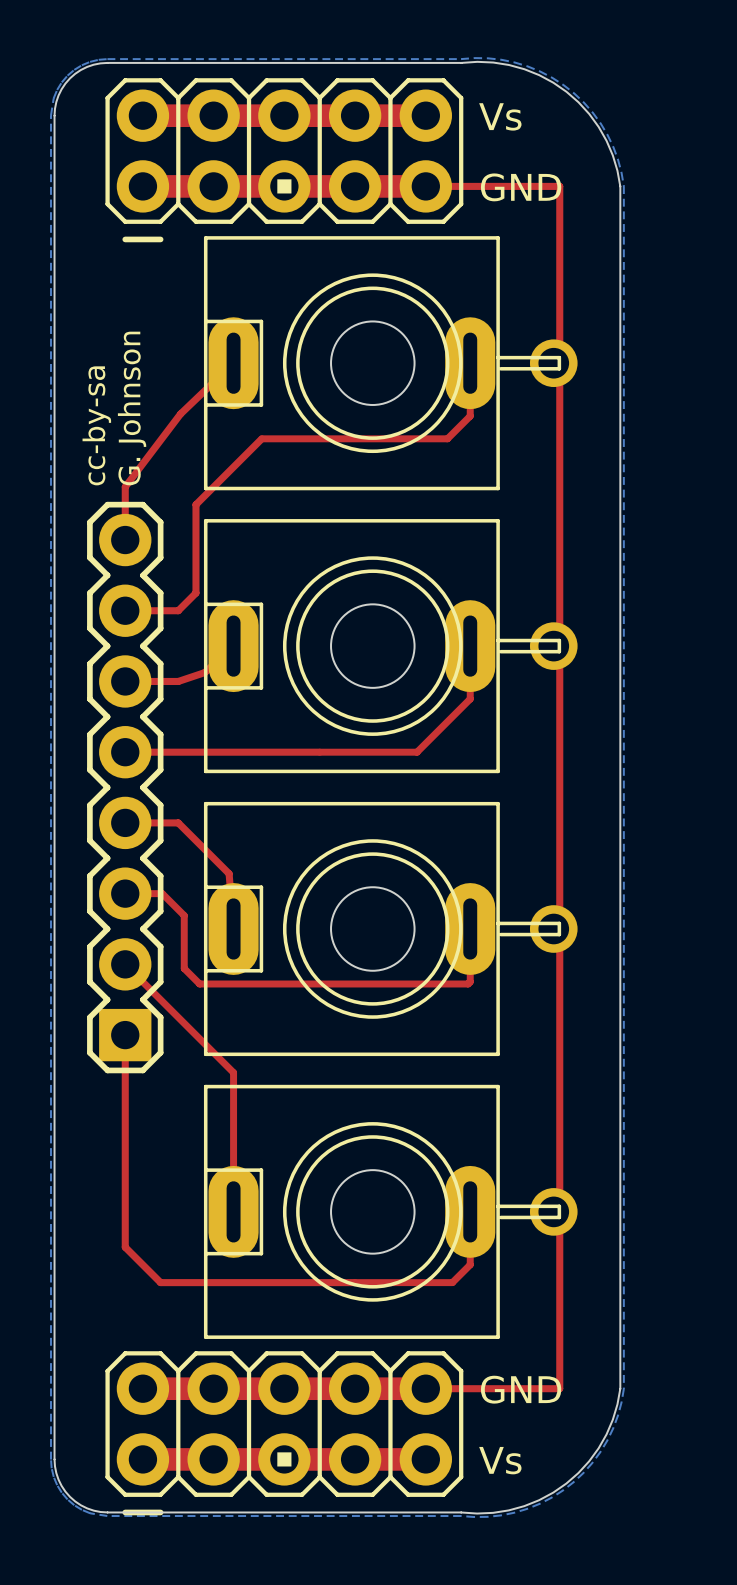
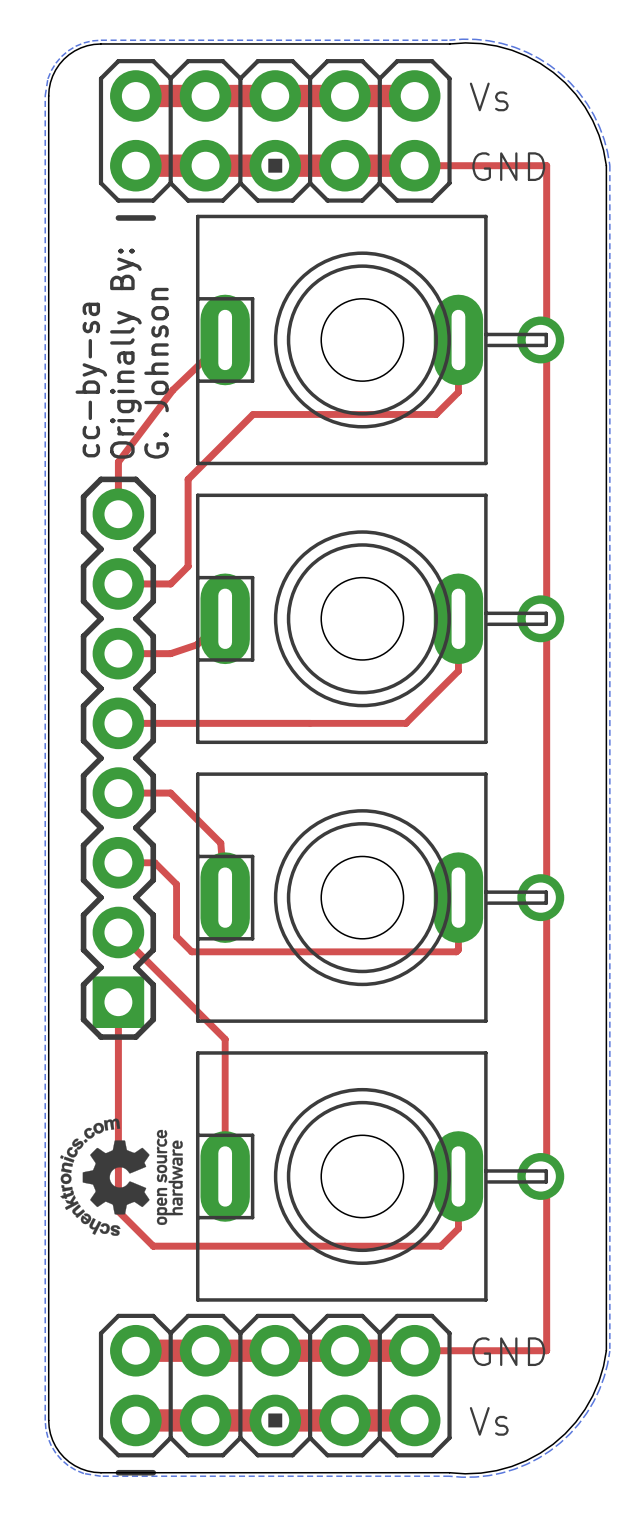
text: G. Johnson (132, 408) -> Originally By: (125, 353)
text: none -> G. Johnson (156, 373)
drawing: none -> [60, 1118, 183, 1236]

